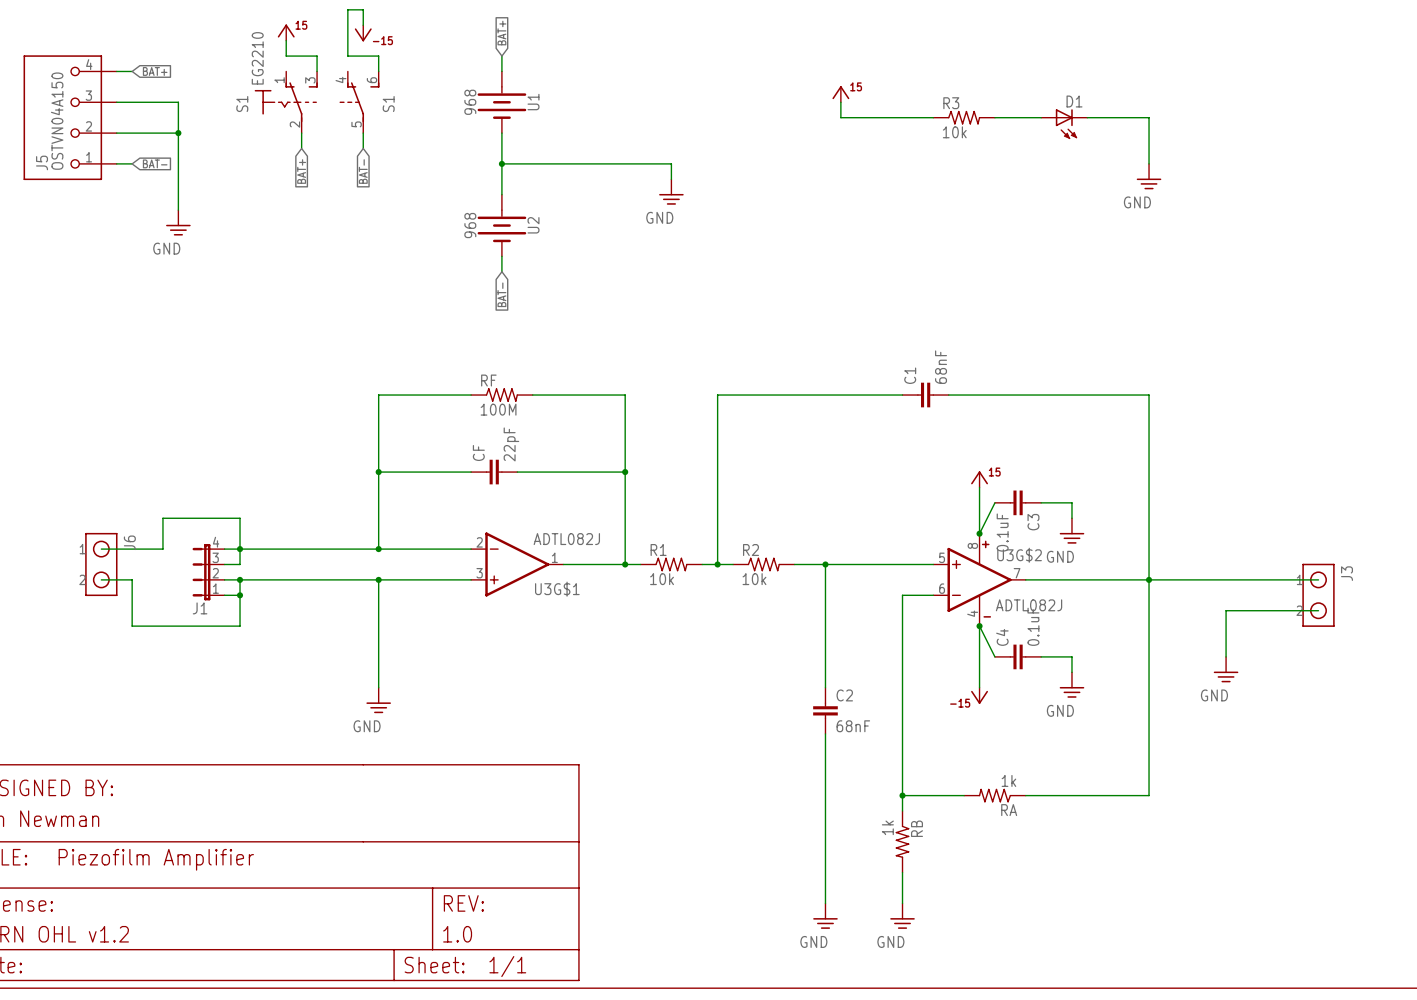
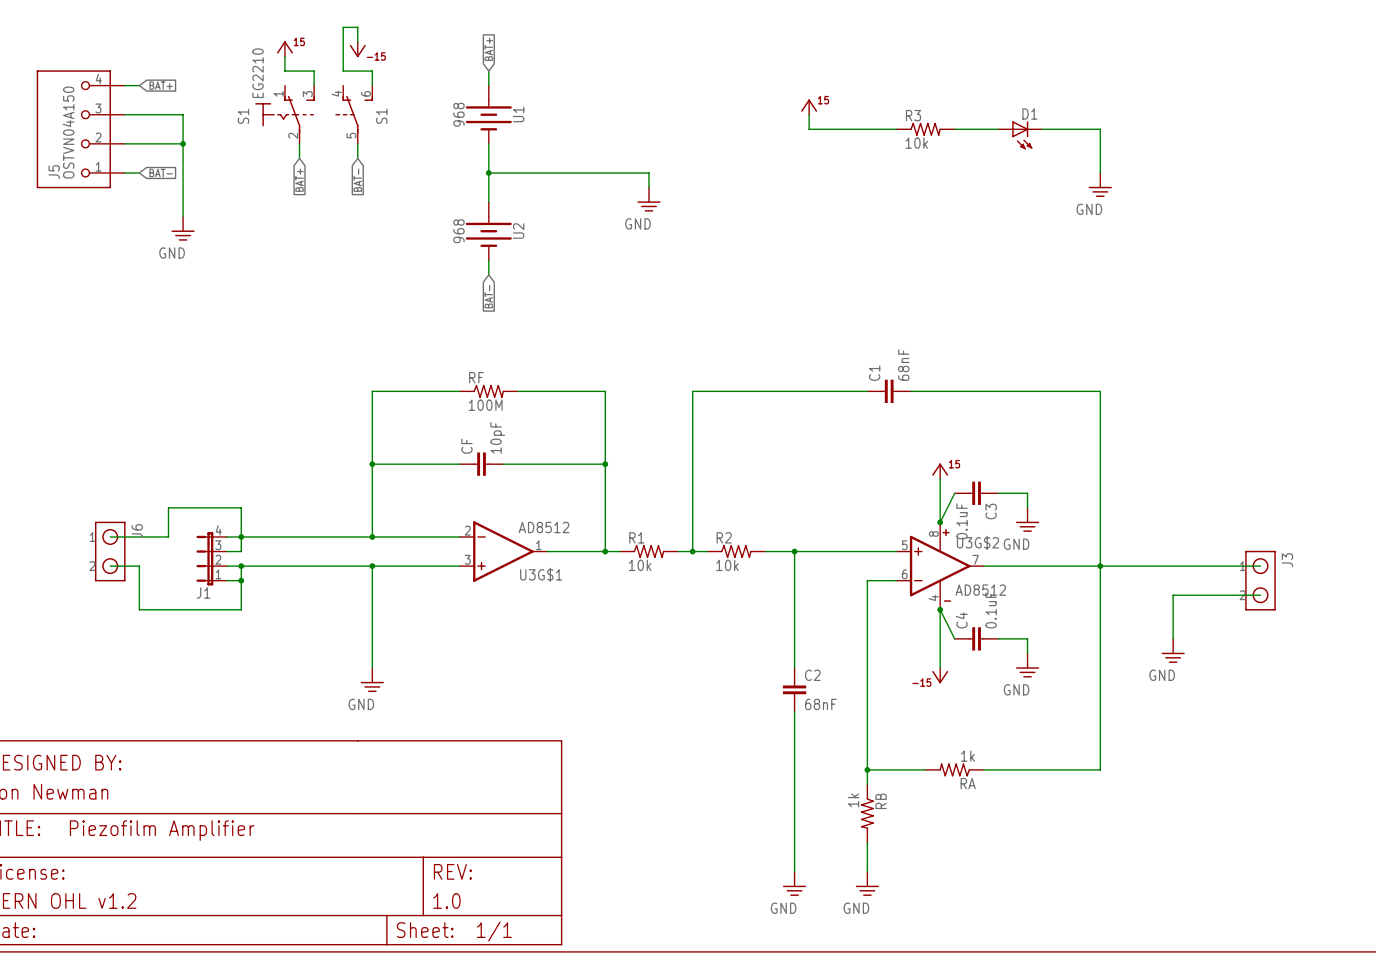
CF value: 22pF (511, 444) -> 10pF (497, 437)
U3G$1 value: ADTL082J (566, 539) -> AD8512 (544, 527)
U3G$2 value: ADTL082J (1029, 605) -> AD8512 (980, 590)

